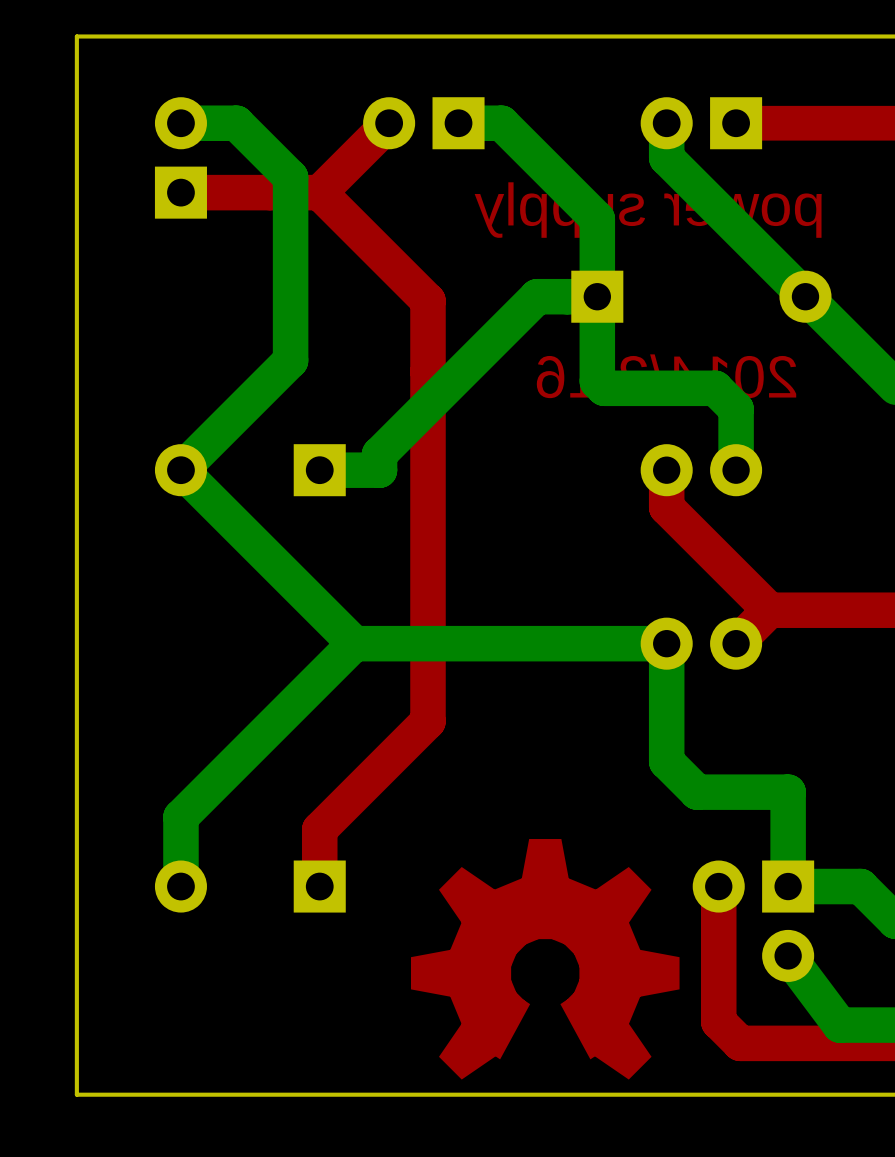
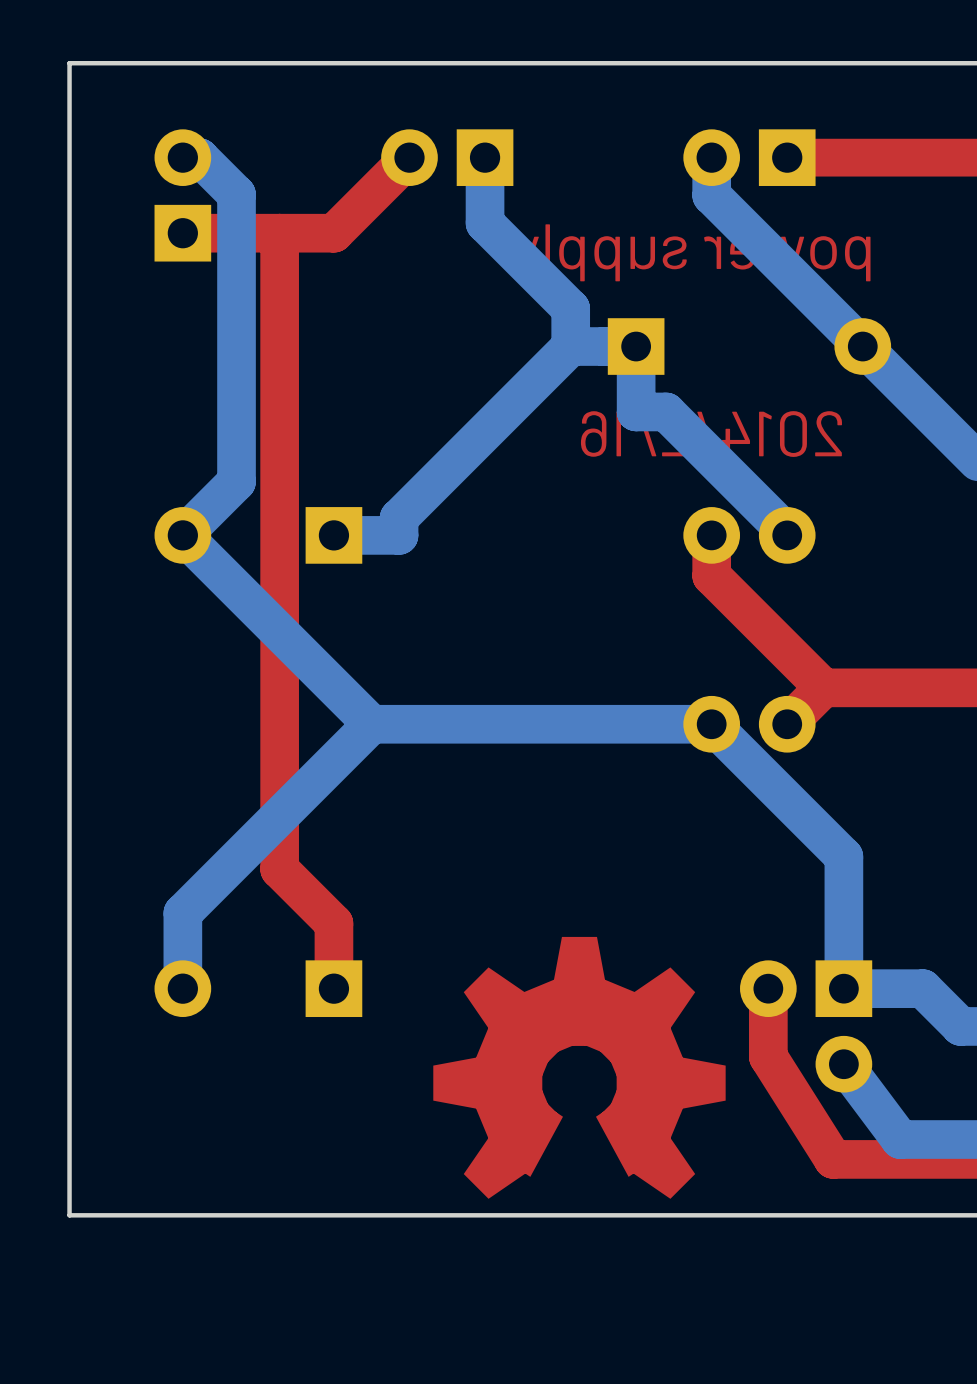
bottom track: (196, 123) (236, 123) (290, 177) (290, 360) (230, 420) -> (199, 157) (236, 194) (236, 481)
bottom track: (458, 123) (501, 123) (597, 218) (597, 296) -> (485, 157) (485, 223) (570, 308) (570, 346)
top track: (319, 192) (427, 300) (427, 721) (319, 829) -> (279, 233) (279, 869) (333, 923) (333, 926)
bottom track: (597, 356) (597, 381) (604, 388) (715, 388) (736, 409) (736, 468) -> (636, 411) (666, 411) (787, 533)
bottom track: (666, 643) (666, 761) (697, 792) (788, 792) -> (711, 724) (843, 856) (843, 885)
top track: (718, 949) (718, 1021) (740, 1043) (778, 1043) -> (768, 1056) (833, 1159)

